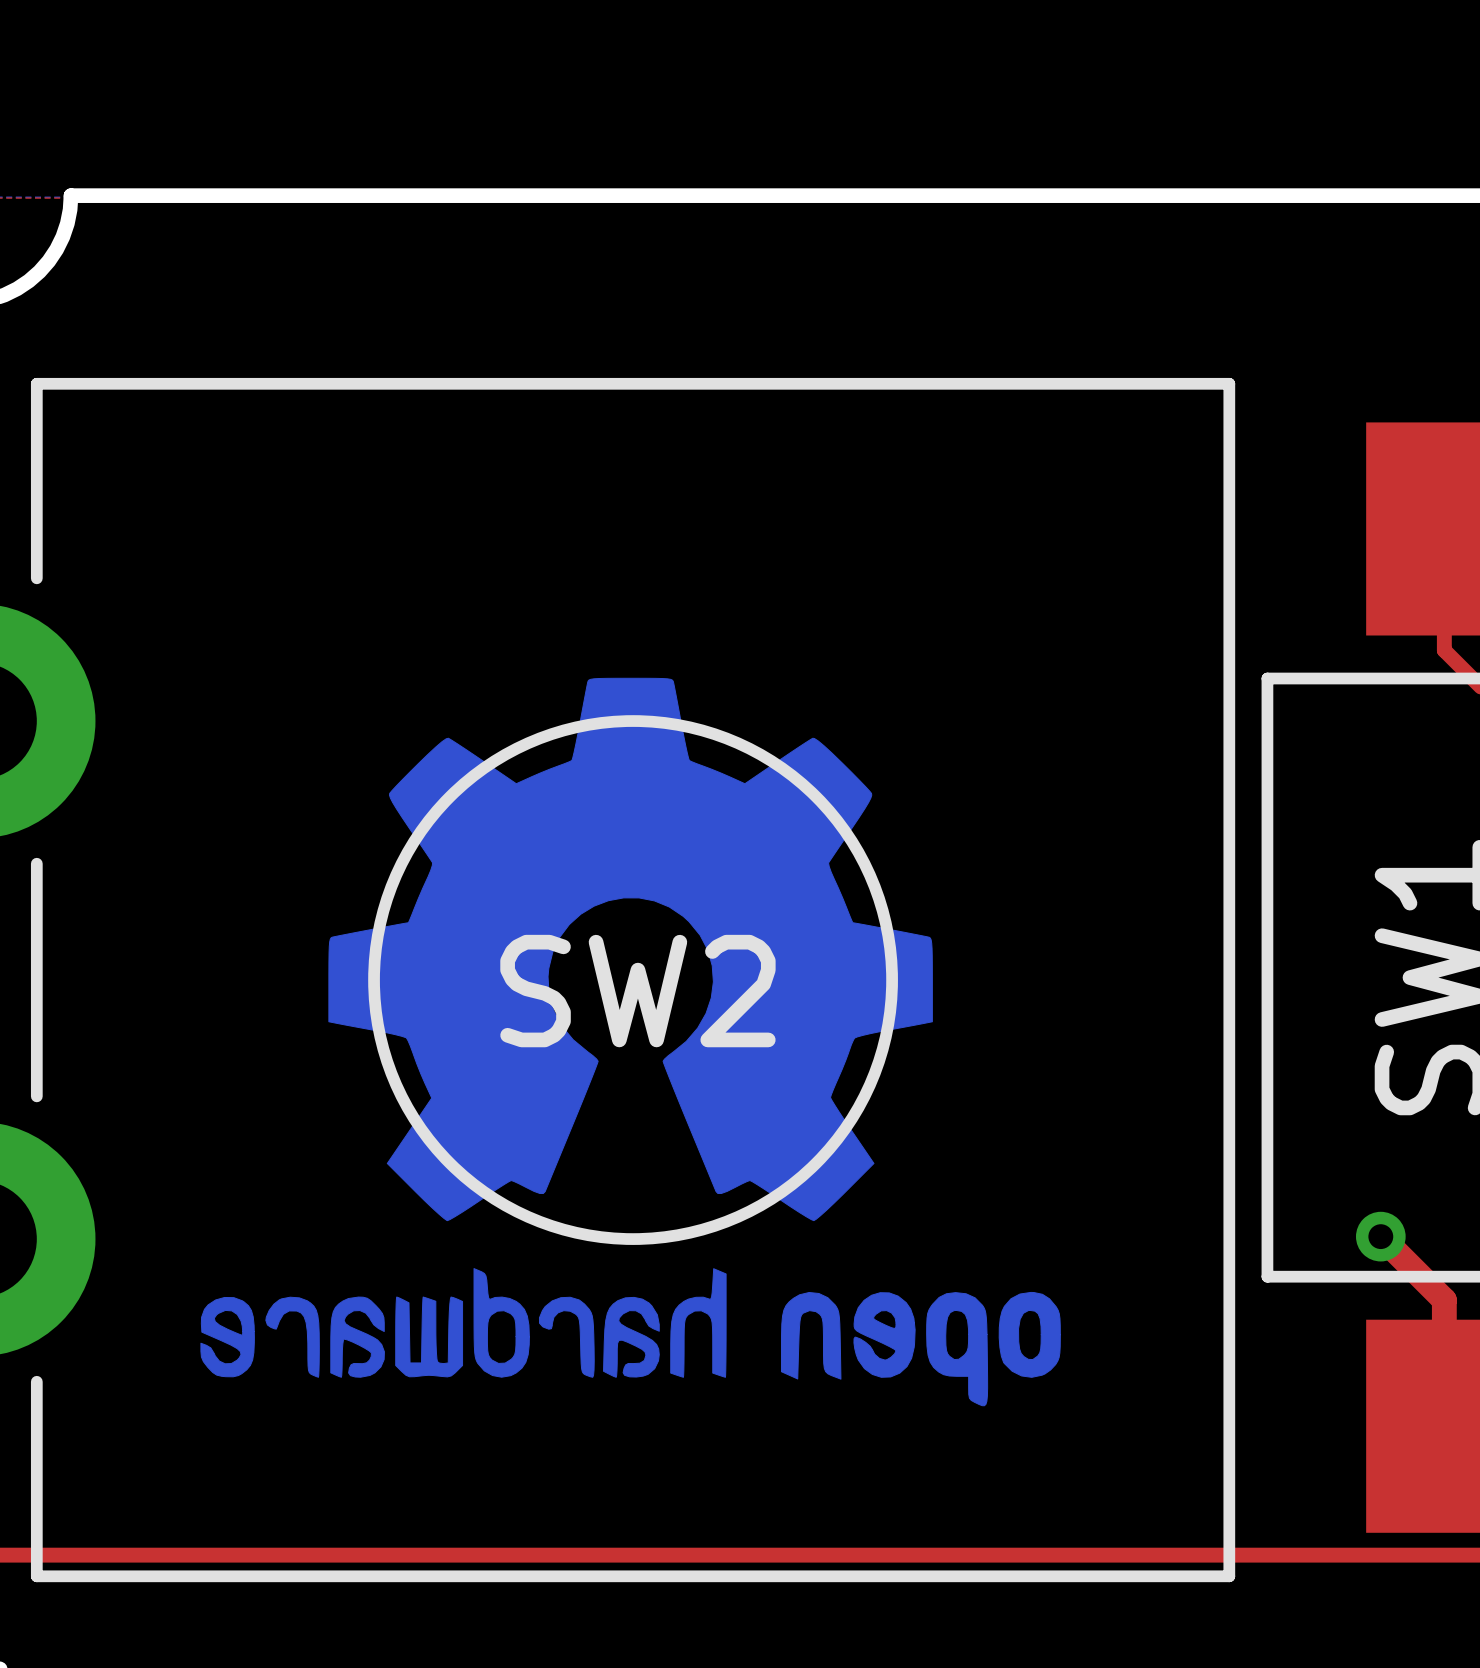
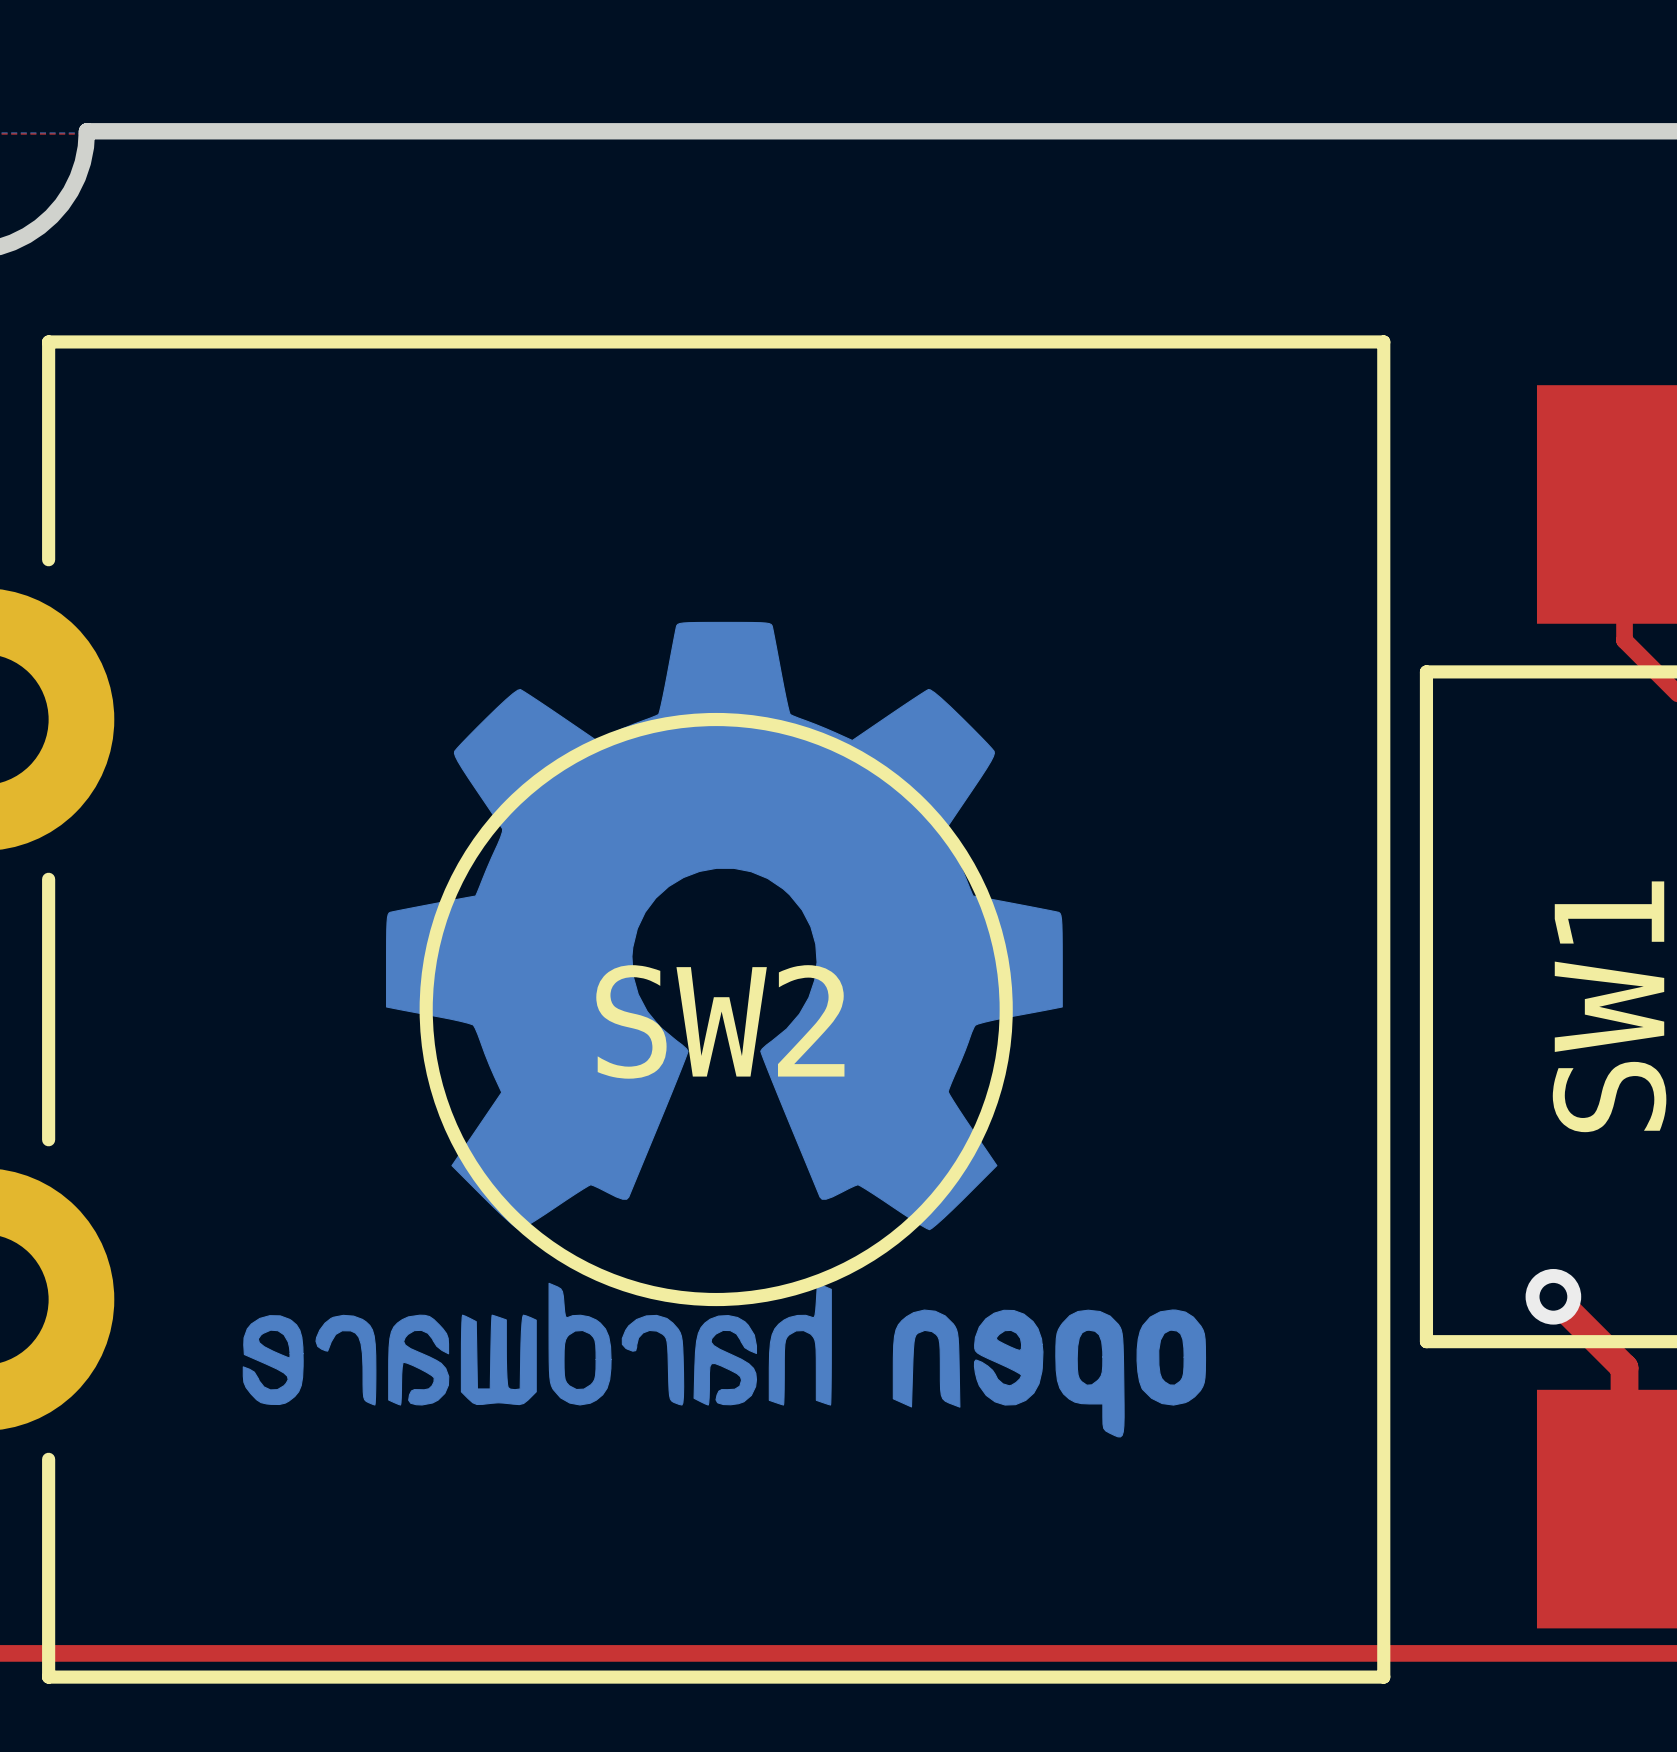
drawing position: (630, 1042) -> (724, 1029)

